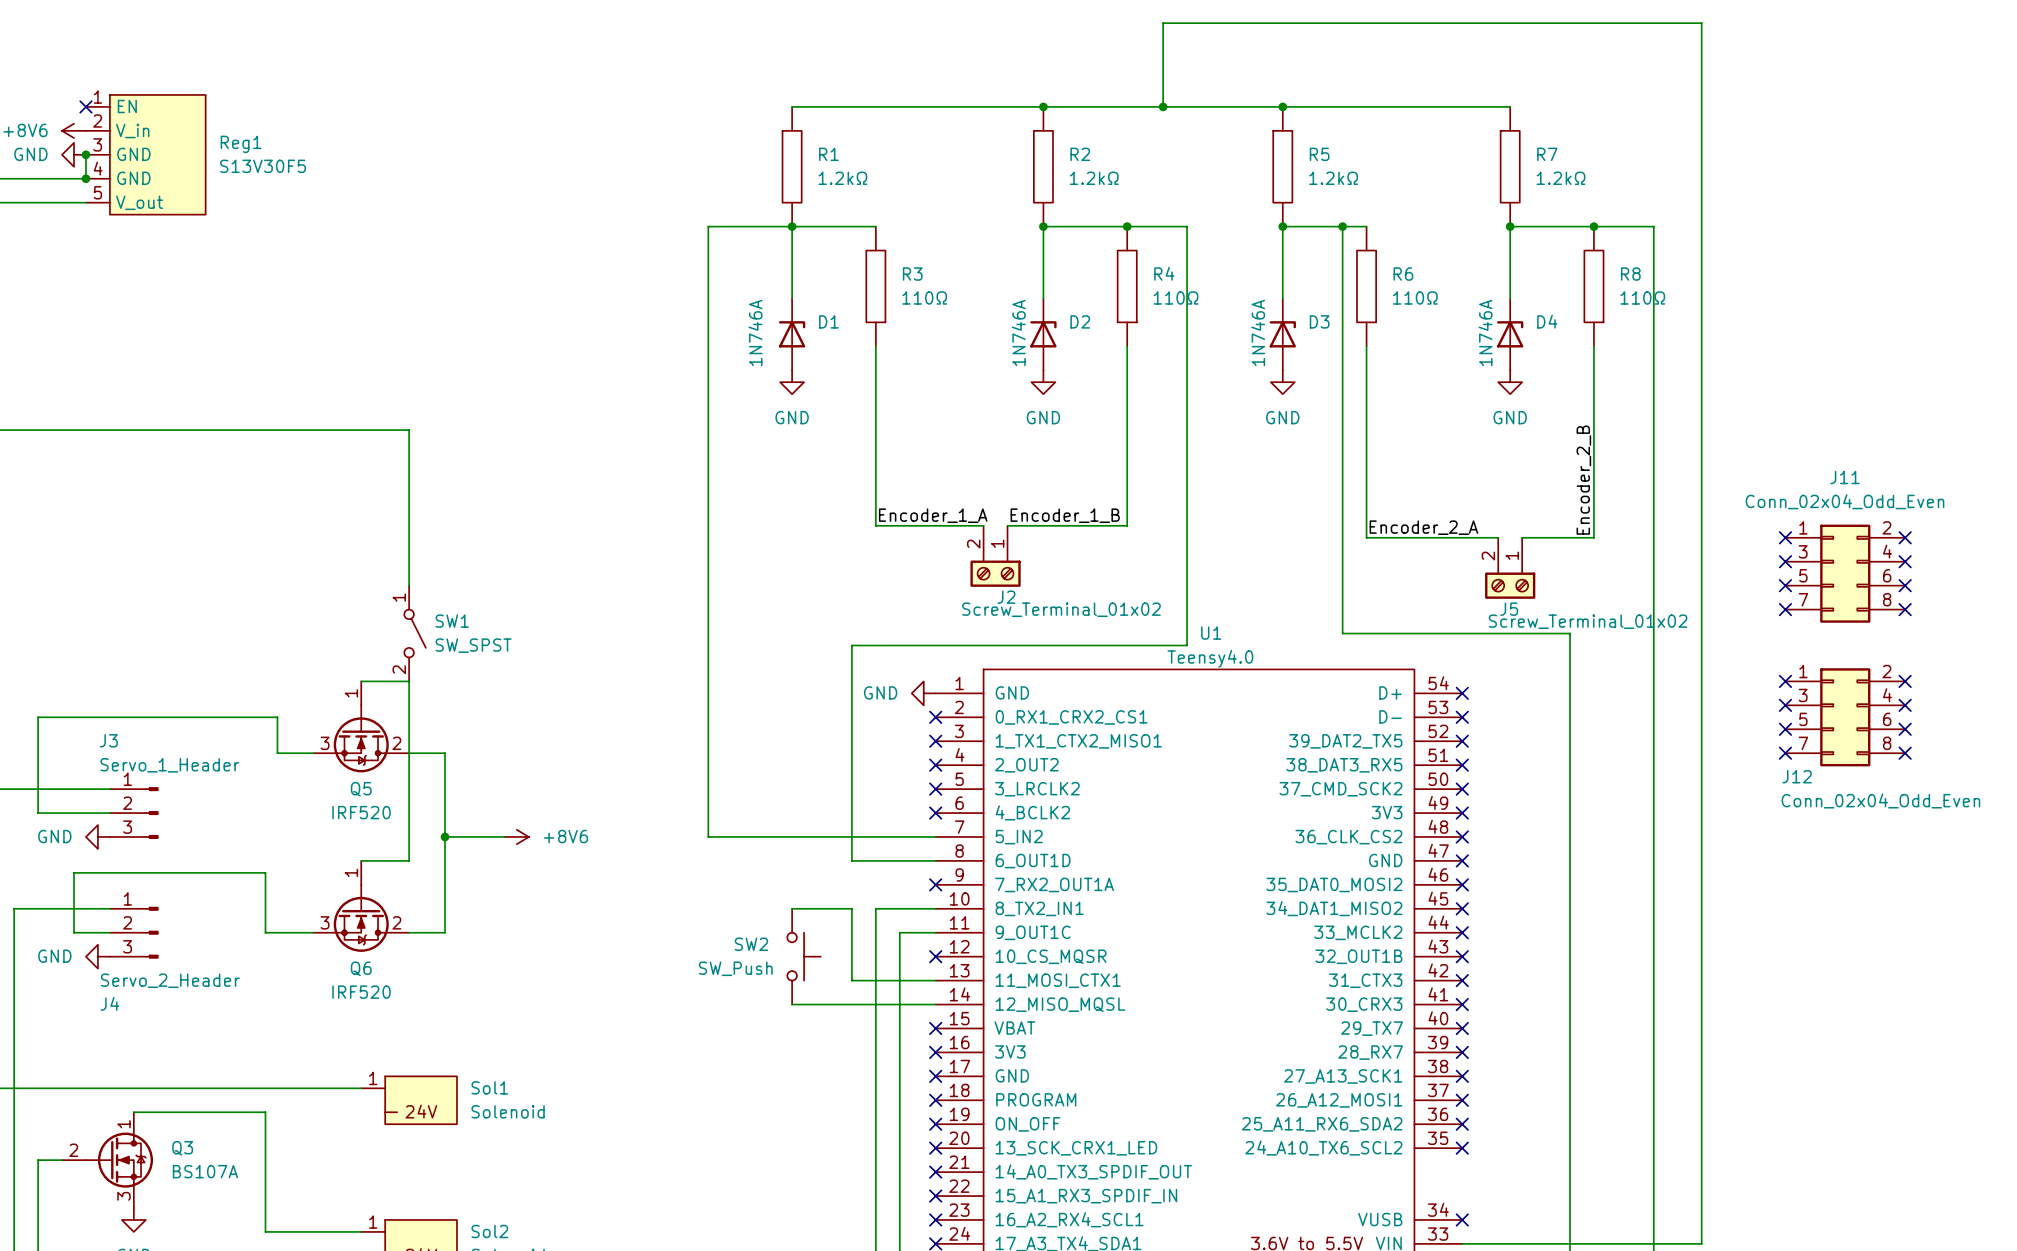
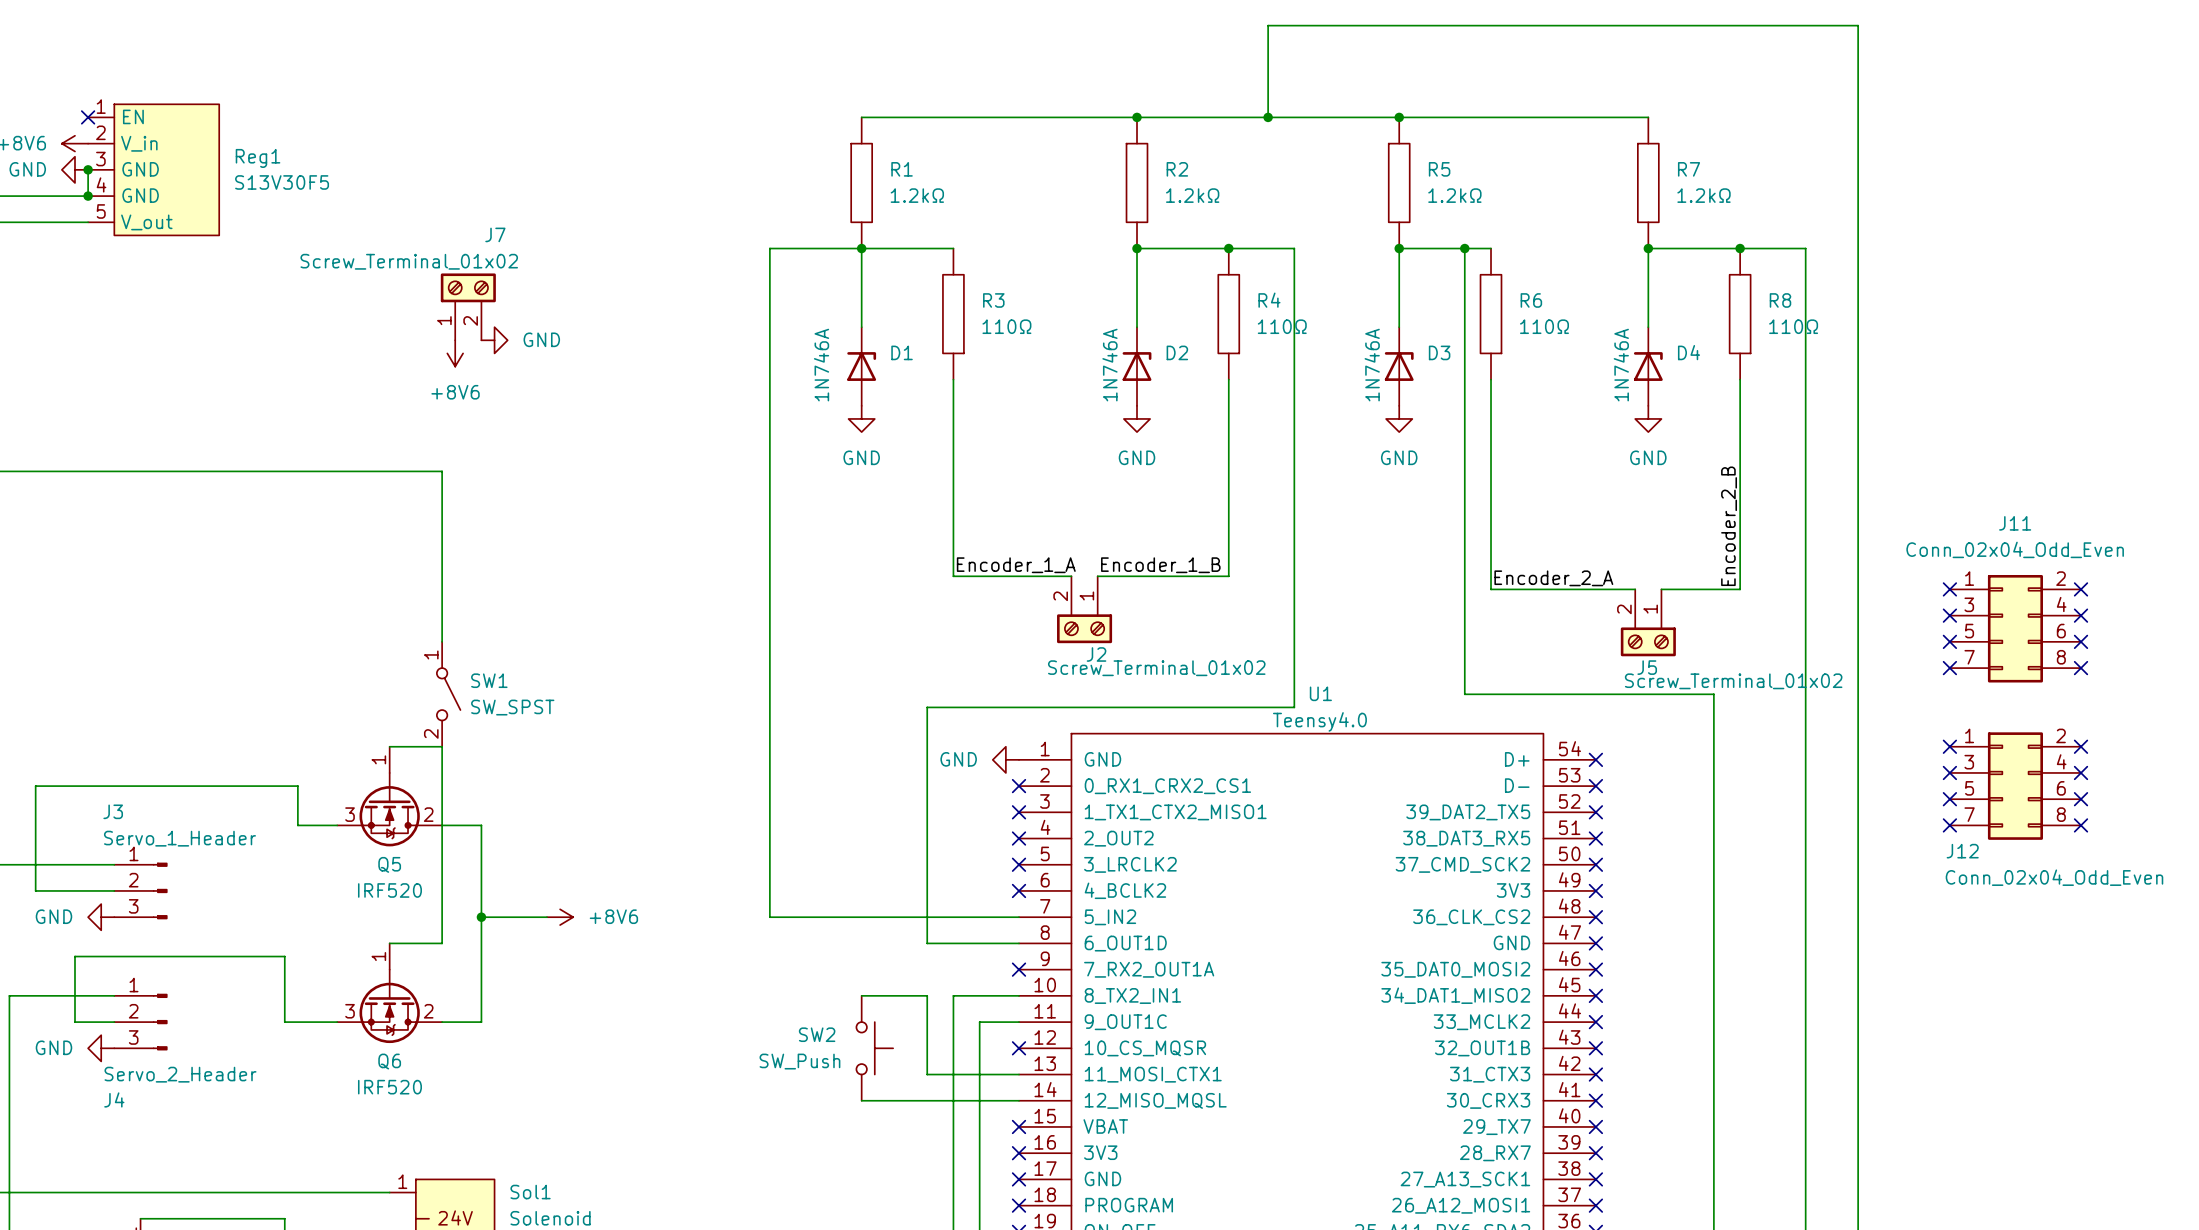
J7: none -> Screw_Terminal_01x02 (468, 306)
power symbol: none -> GND (494, 340)
power symbol: none -> +8V6 (455, 353)

